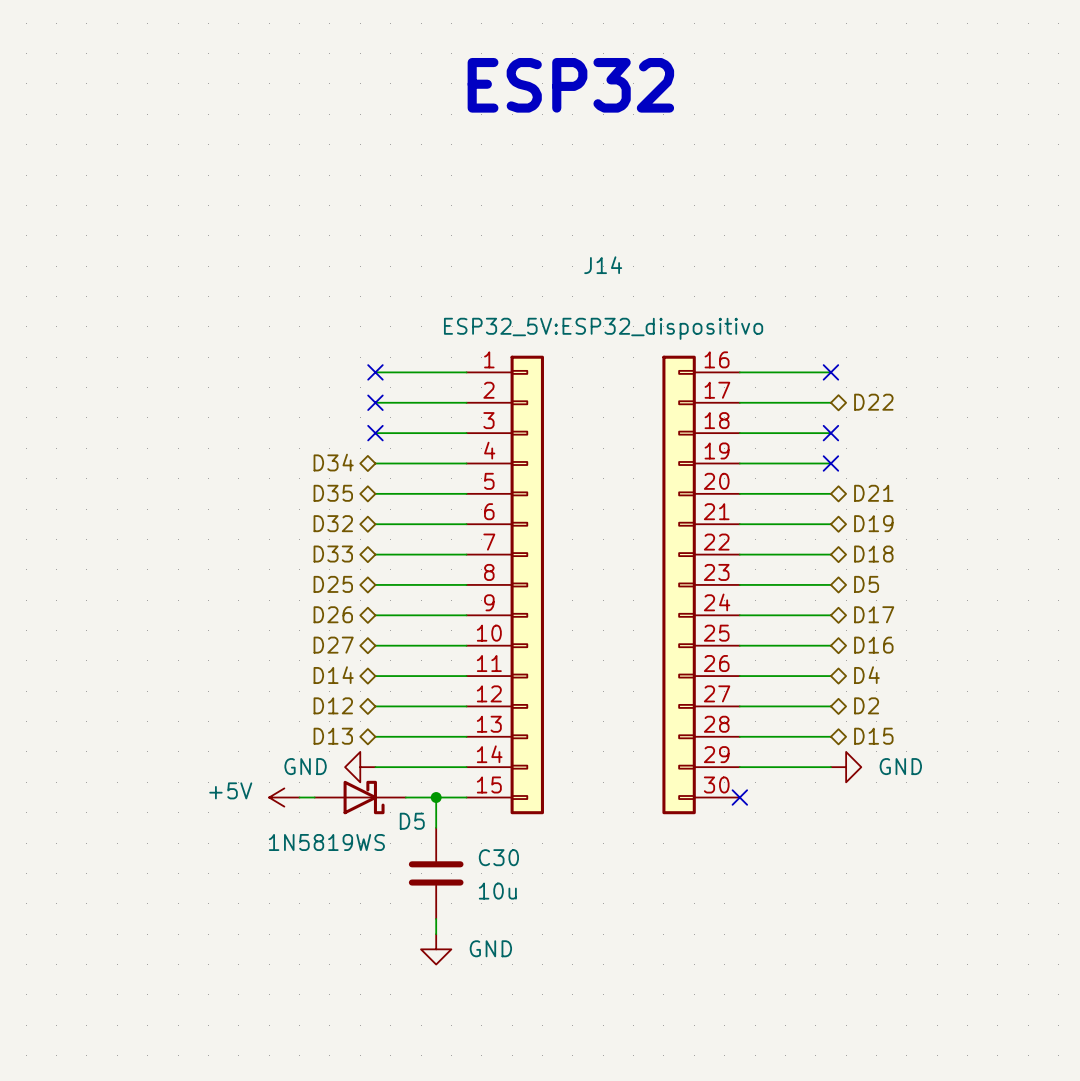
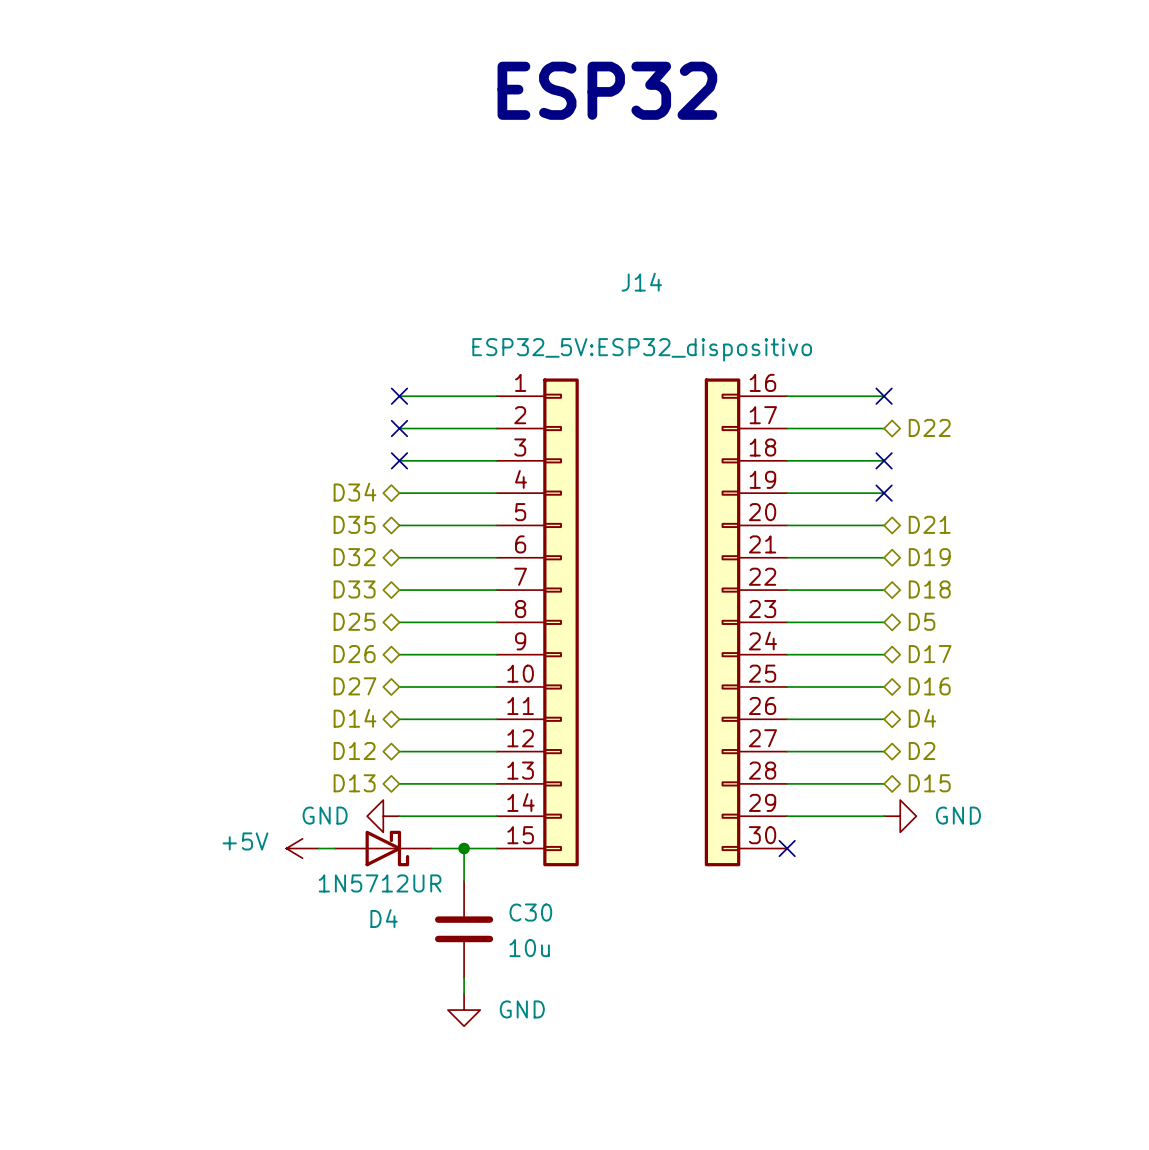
D5 name: D5 (412, 821) -> D4 (384, 918)
D5 value: 1N5819WS (326, 842) -> 1N5712UR (380, 883)

